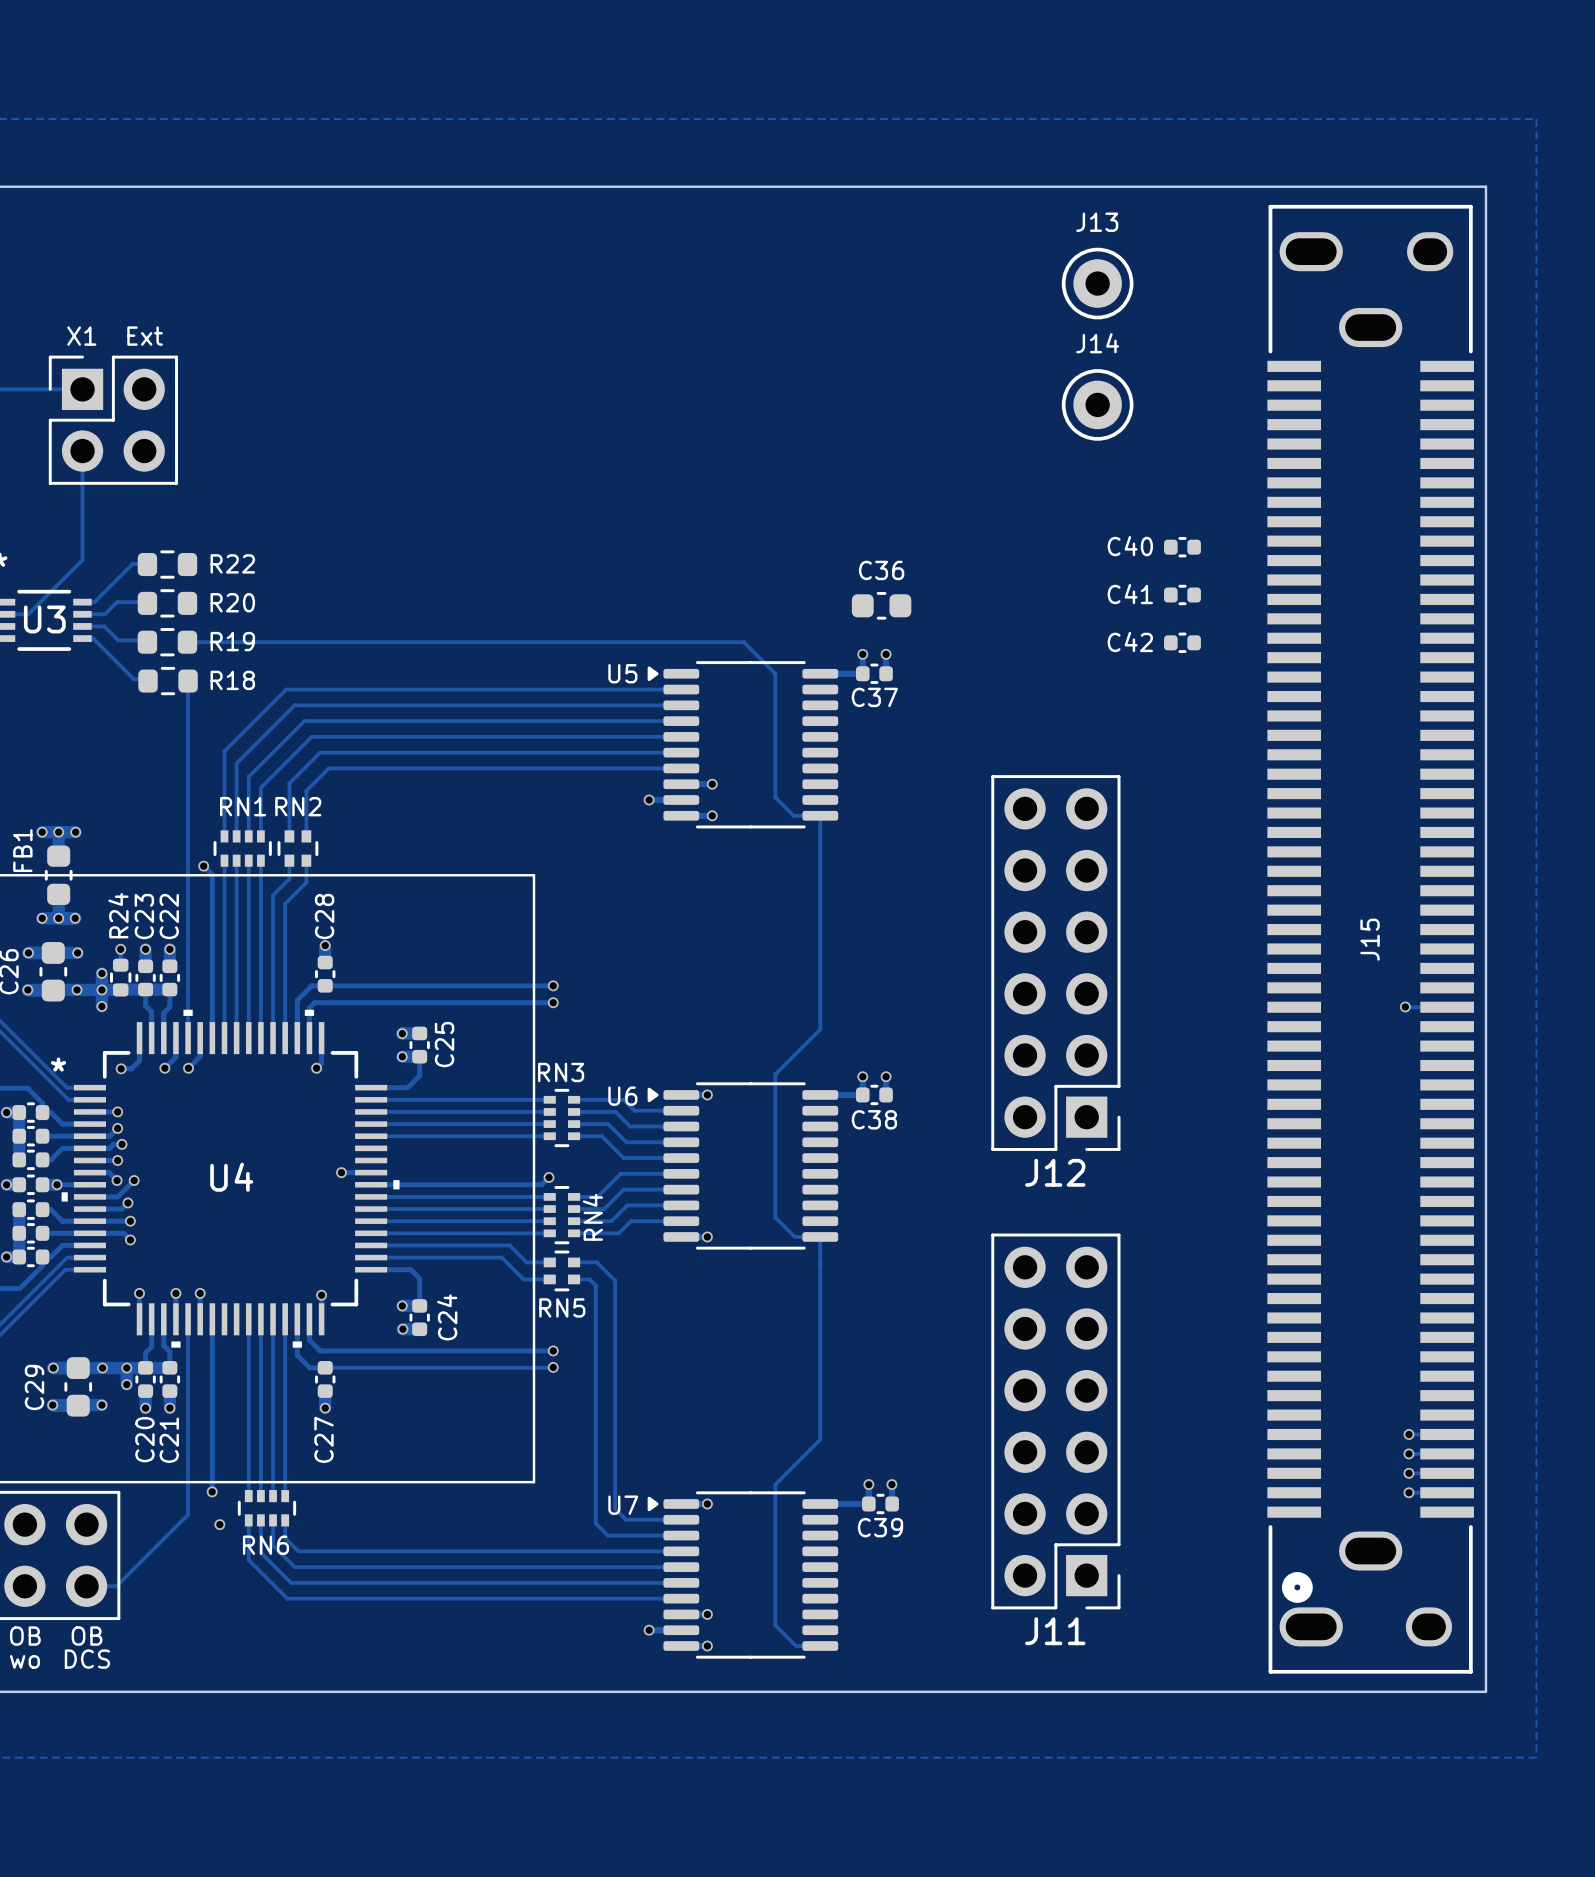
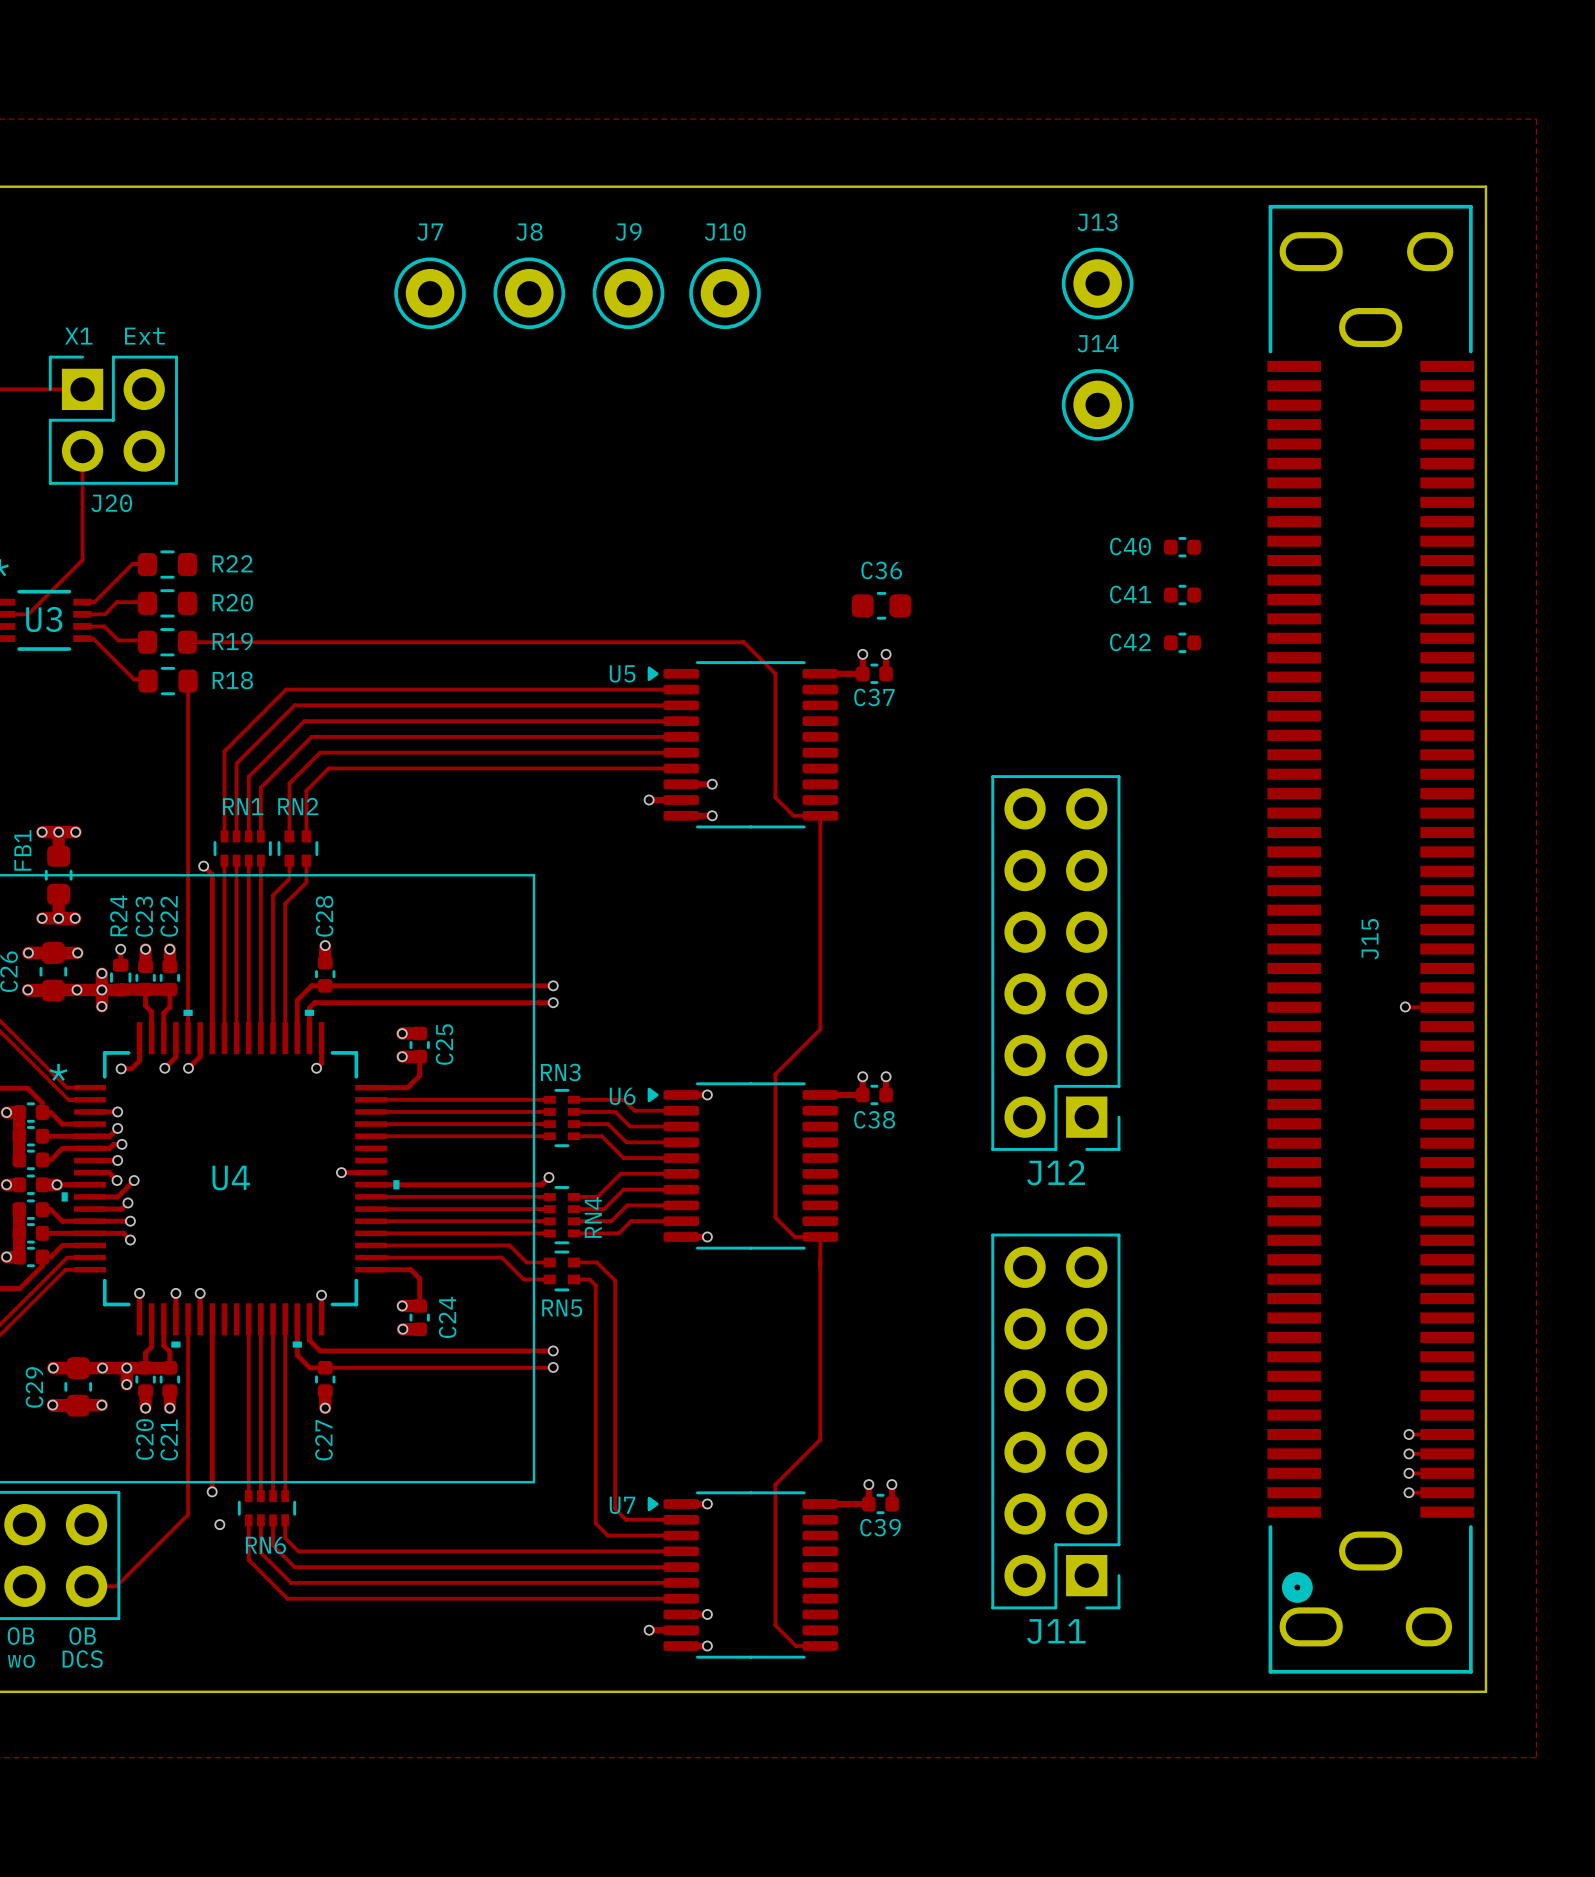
J7: none -> (430, 293)
J8: none -> (529, 293)
J9: none -> (628, 293)
J10: none -> (725, 293)
J20 name: none -> J20 (111, 503)

